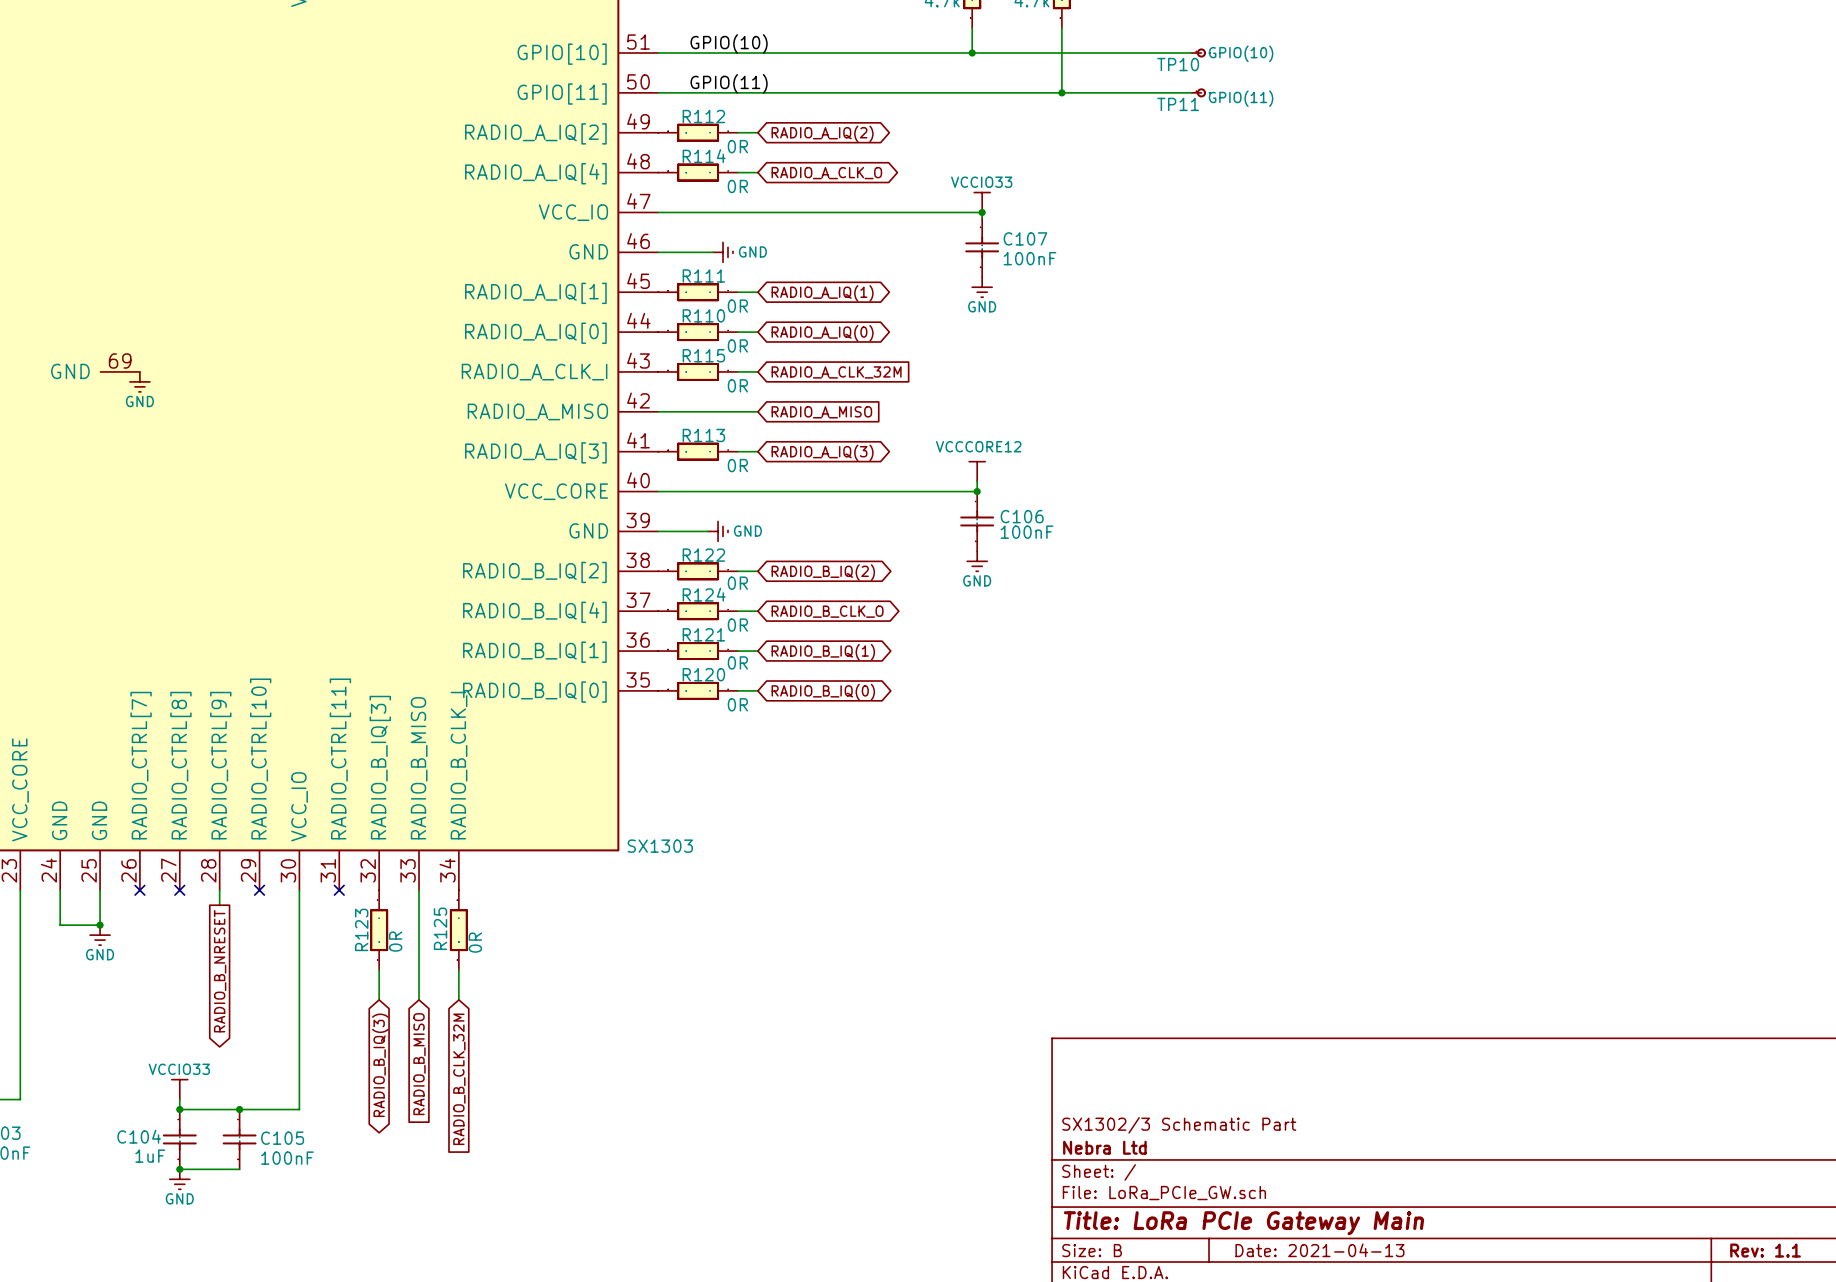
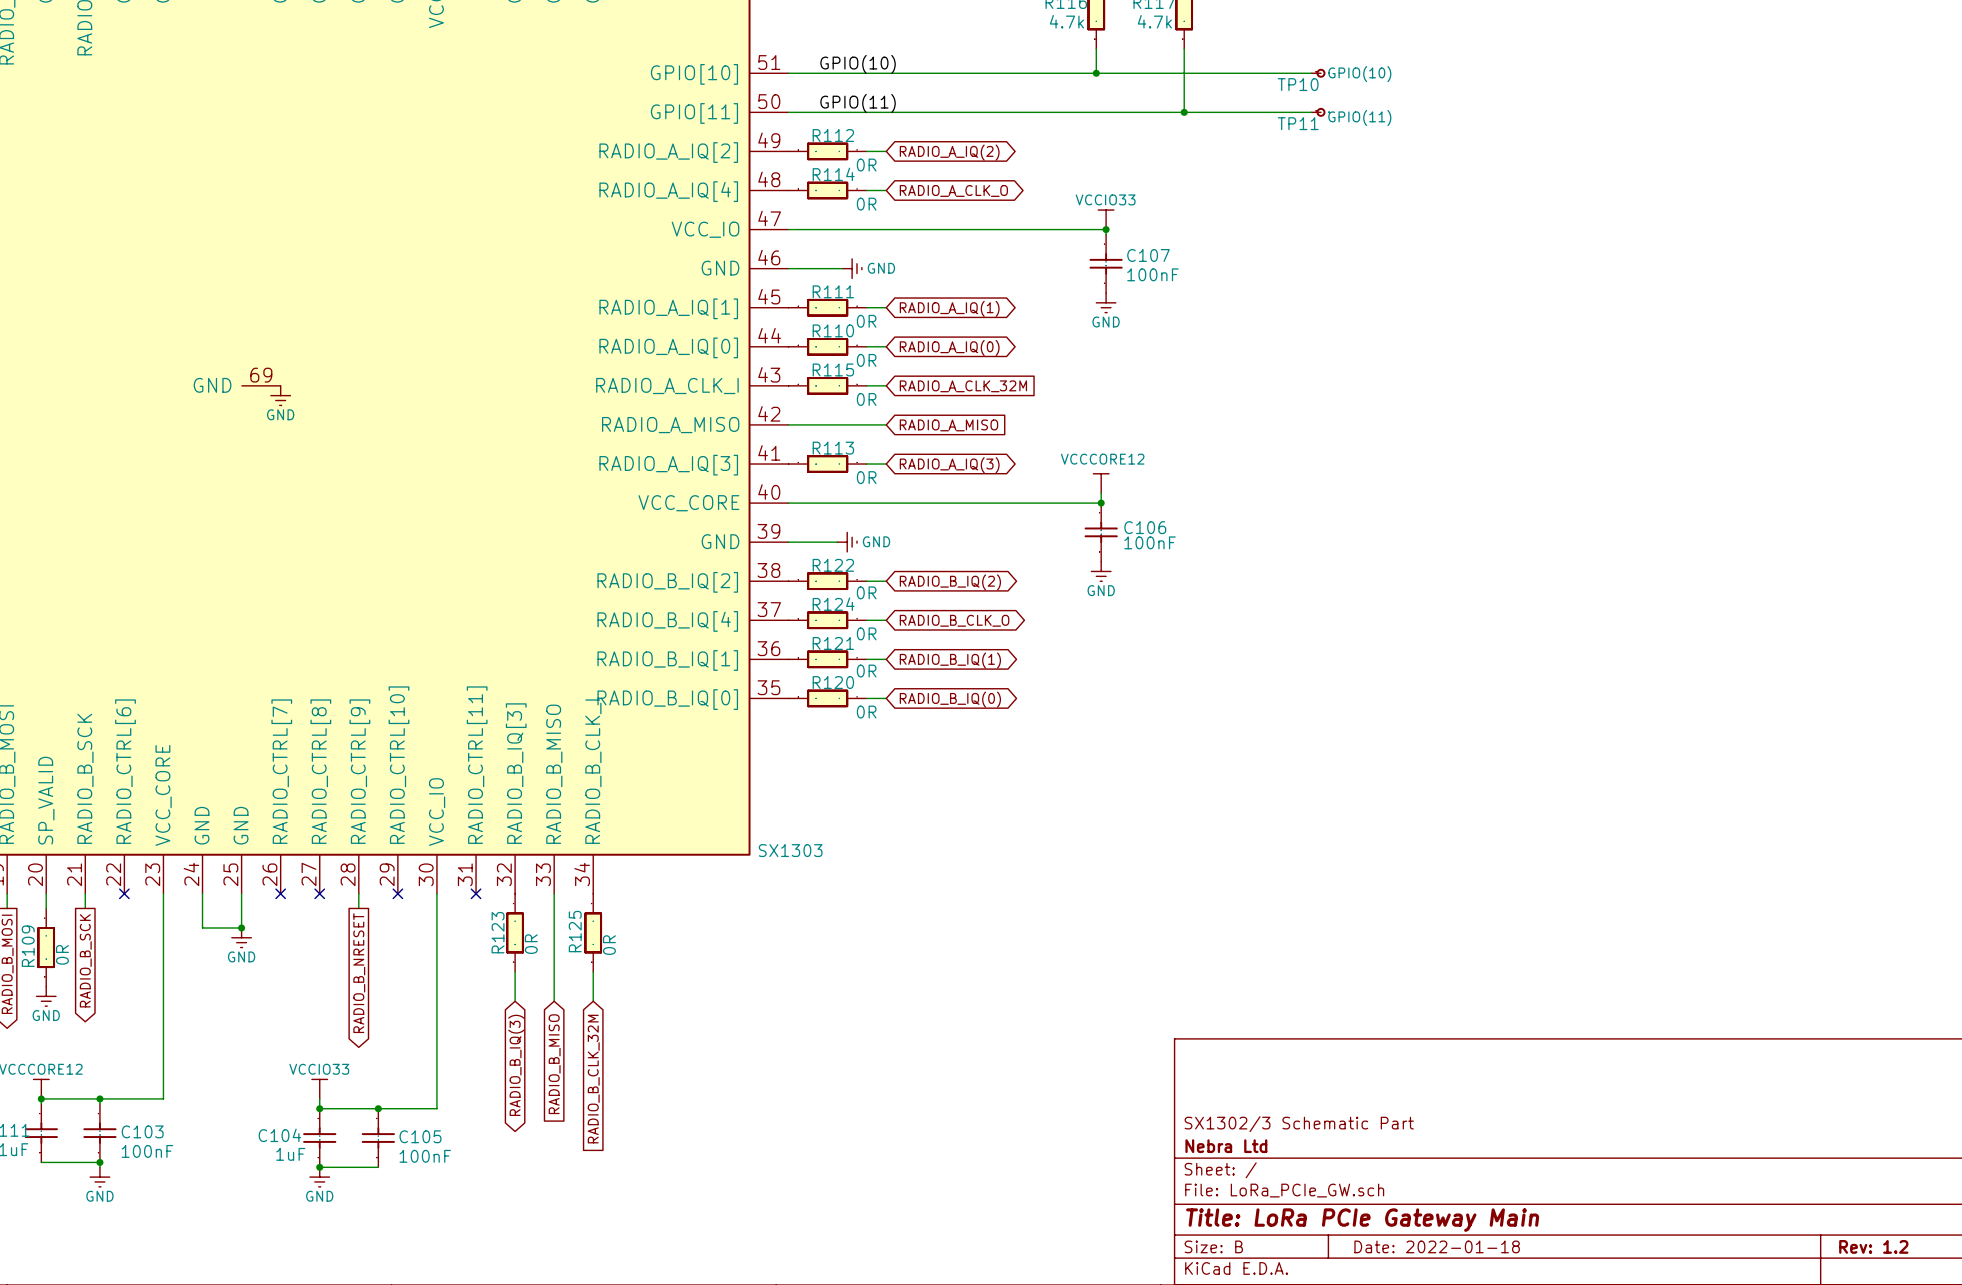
title block: Date: 2021-04-13 (1319, 1250) -> Date: 2022-01-18 (1437, 1246)
title block: Rev: 1.1 (1765, 1250) -> Rev: 1.2 (1873, 1246)

